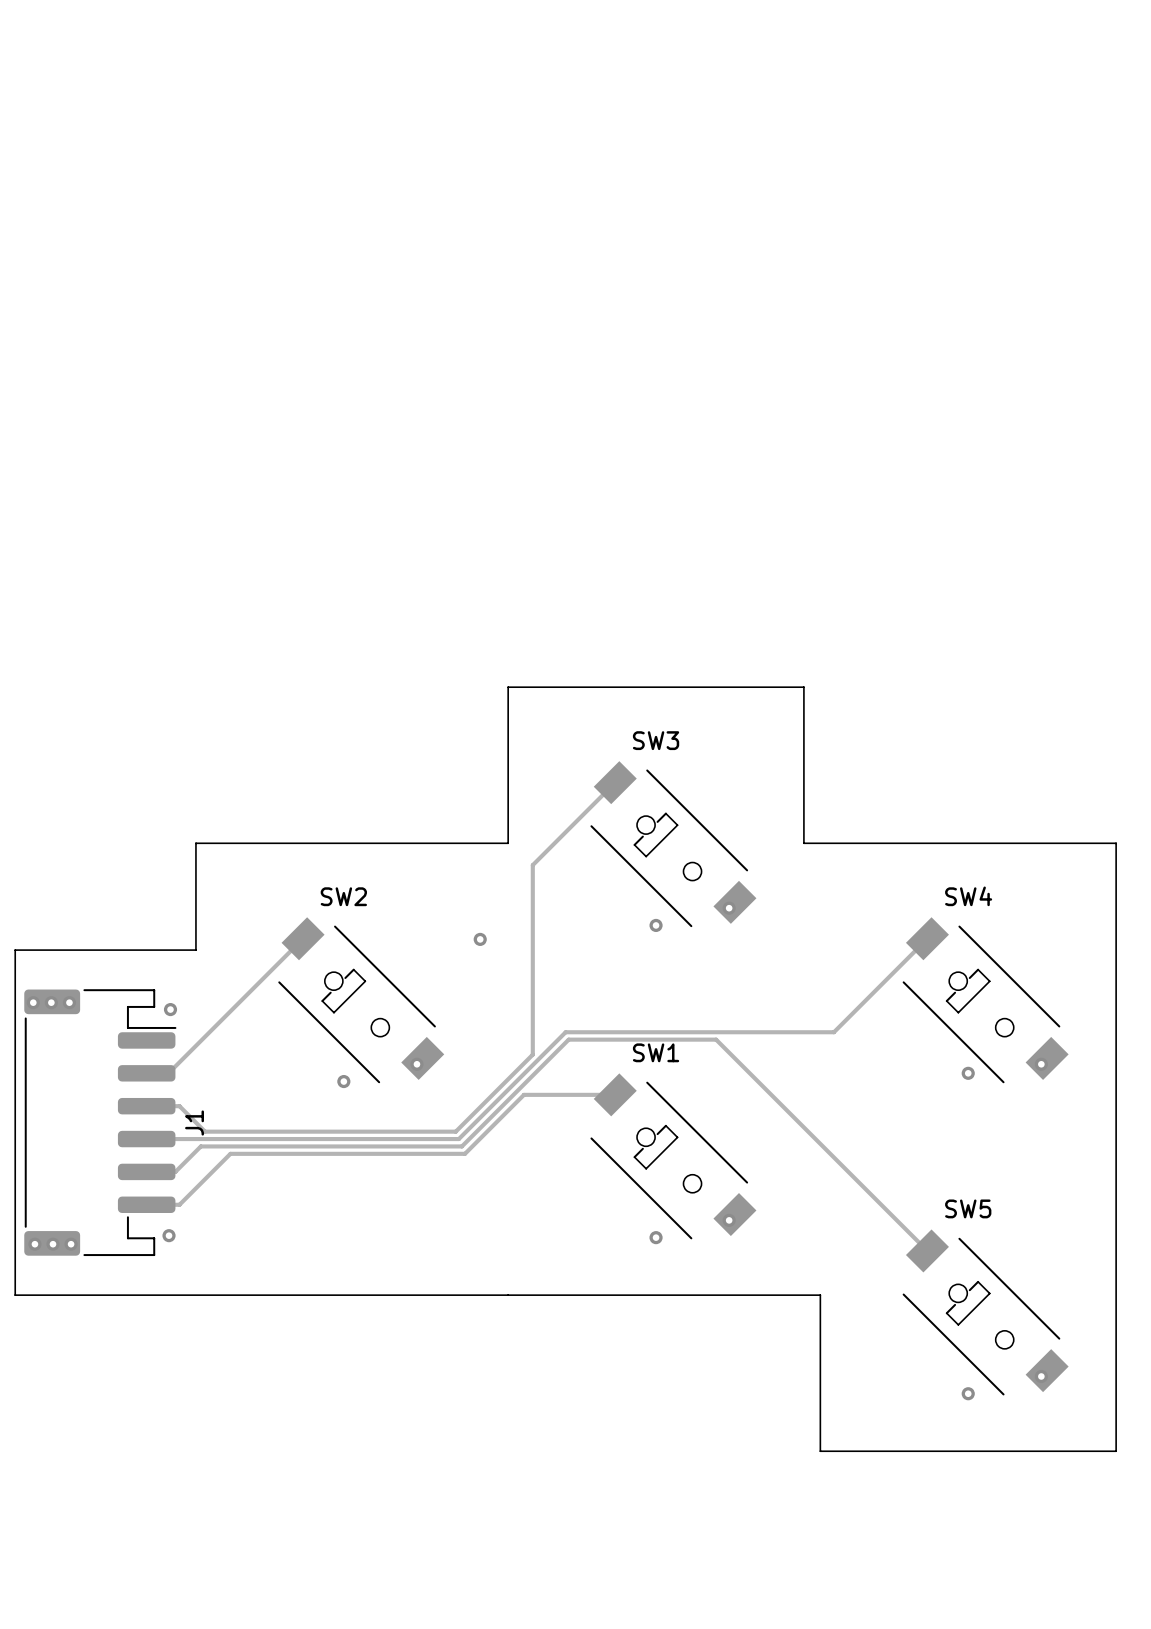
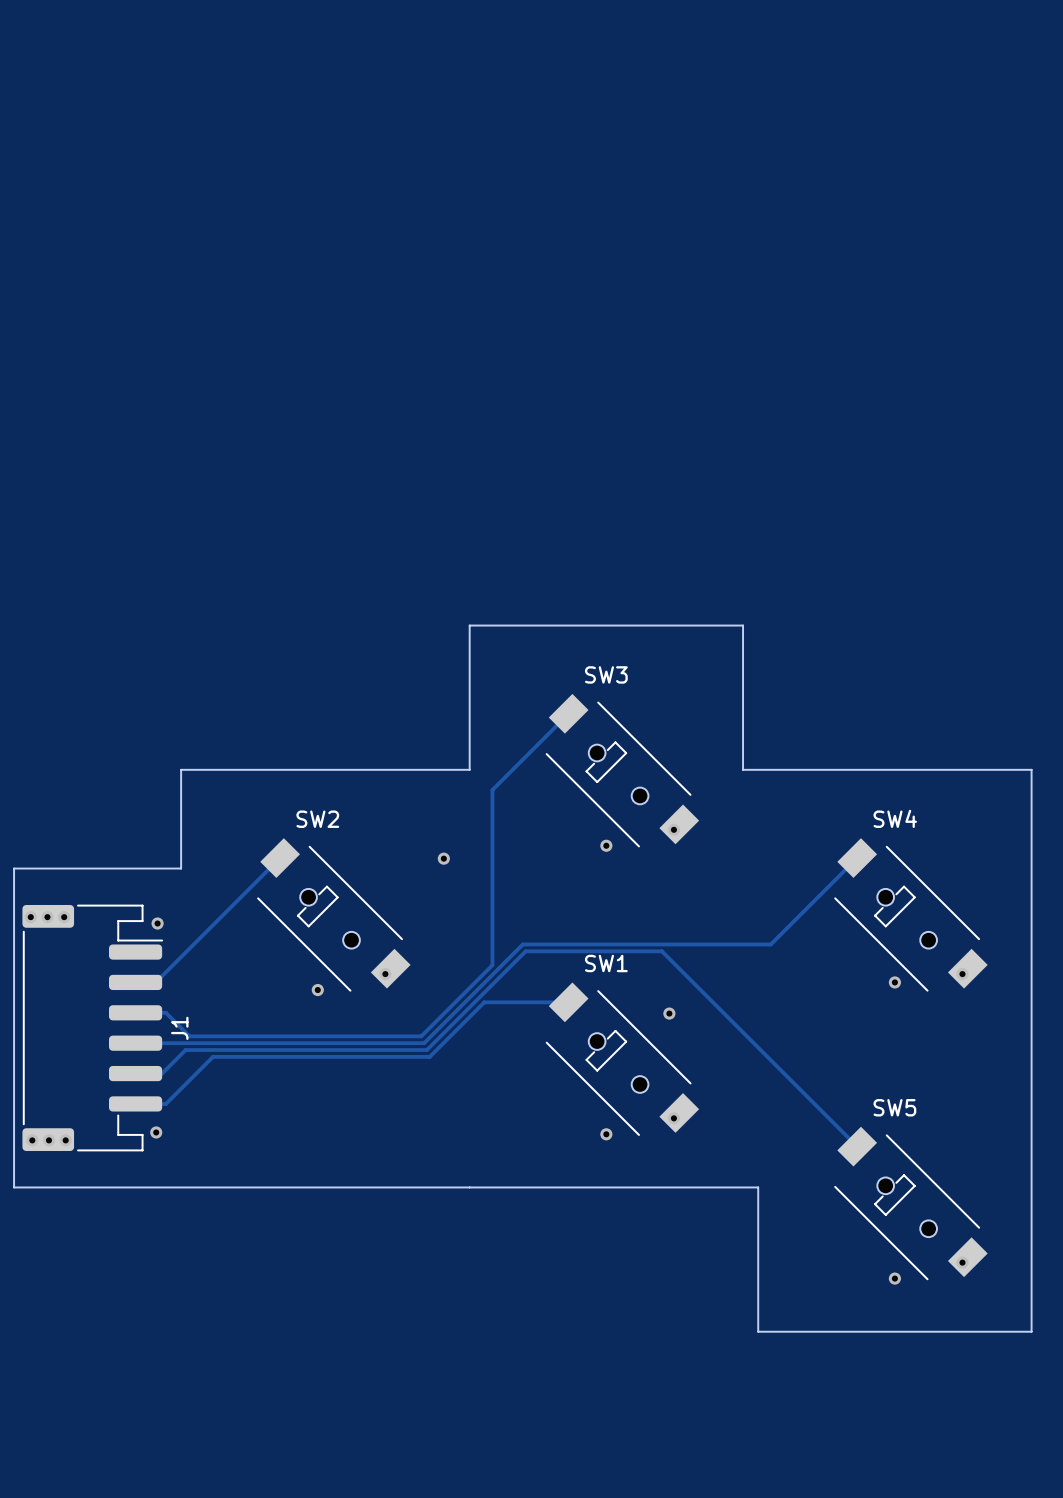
via: none -> (669, 1013)

